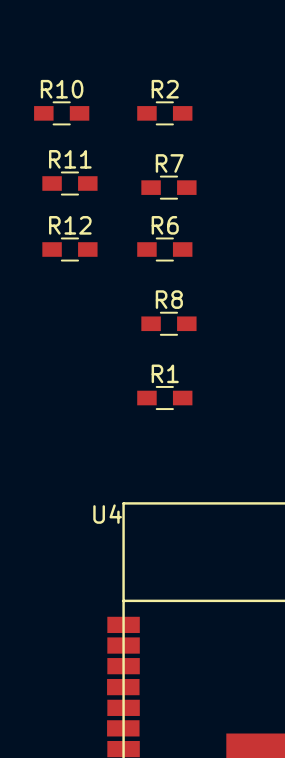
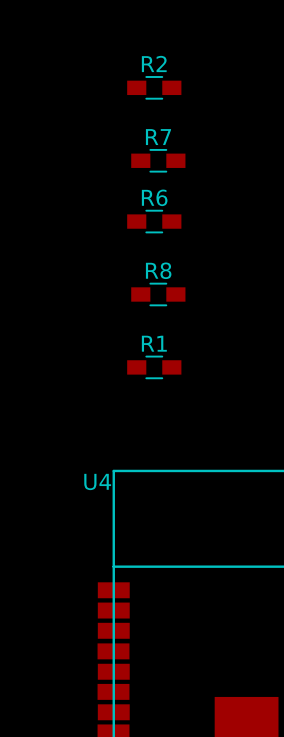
R10: (61, 113) -> none
R11: (69, 183) -> none
R12: (69, 249) -> none

